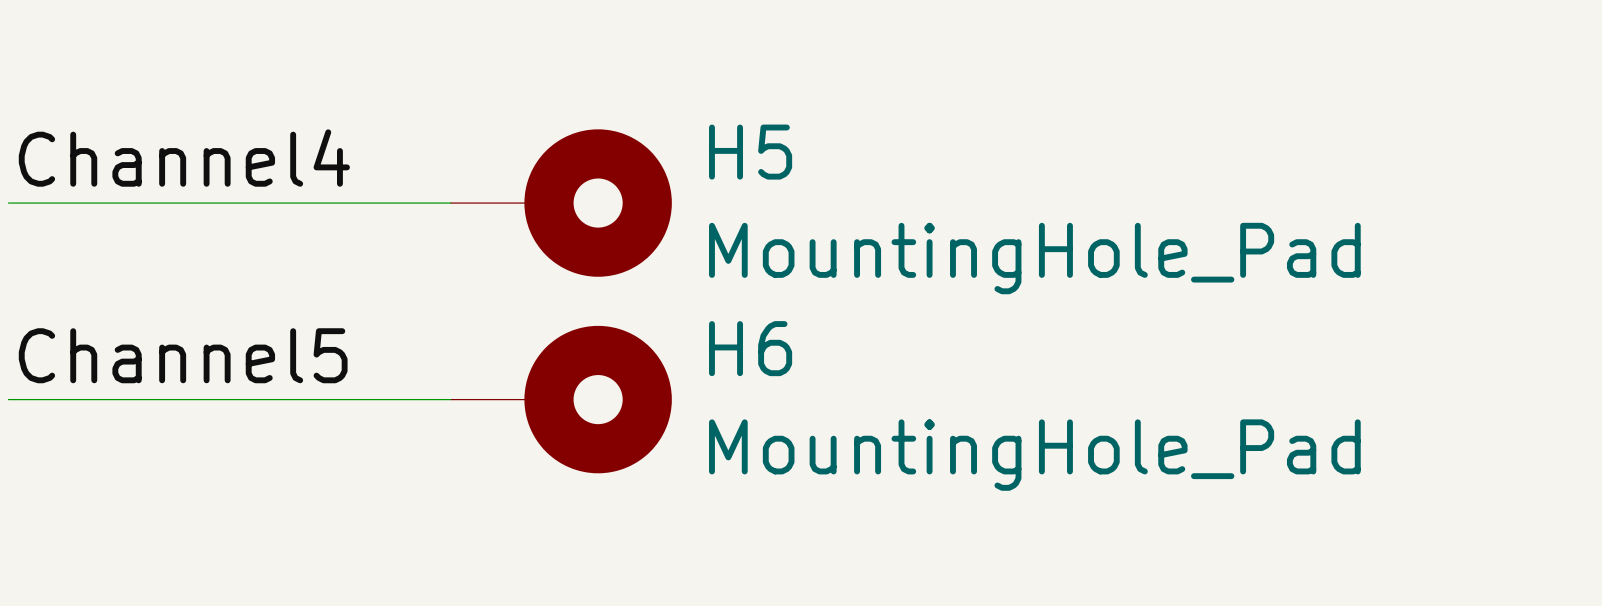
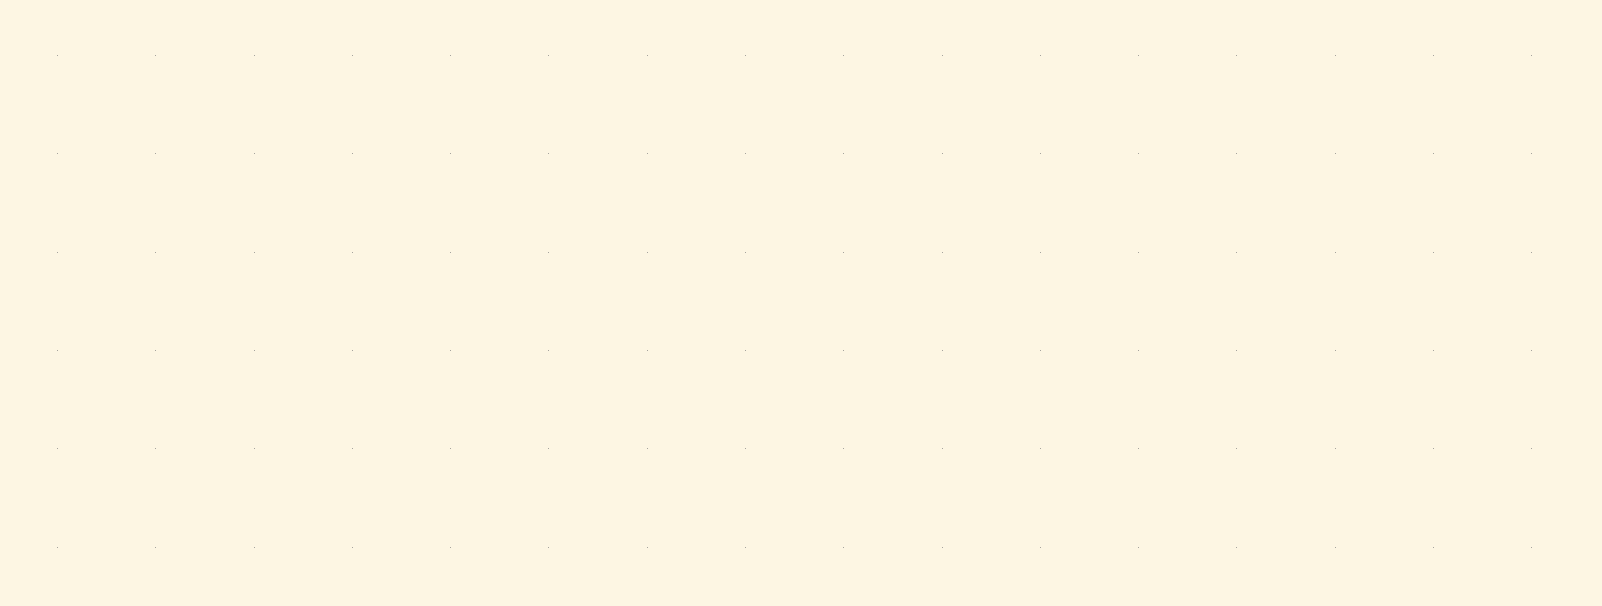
label: Channel4 (184, 158) -> none
wire: (8, 203) (450, 203) -> none
H5: MountingHole_Pad (561, 203) -> none
label: Channel5 (183, 355) -> none
wire: (8, 399) (450, 399) -> none
H6: MountingHole_Pad (561, 399) -> none

